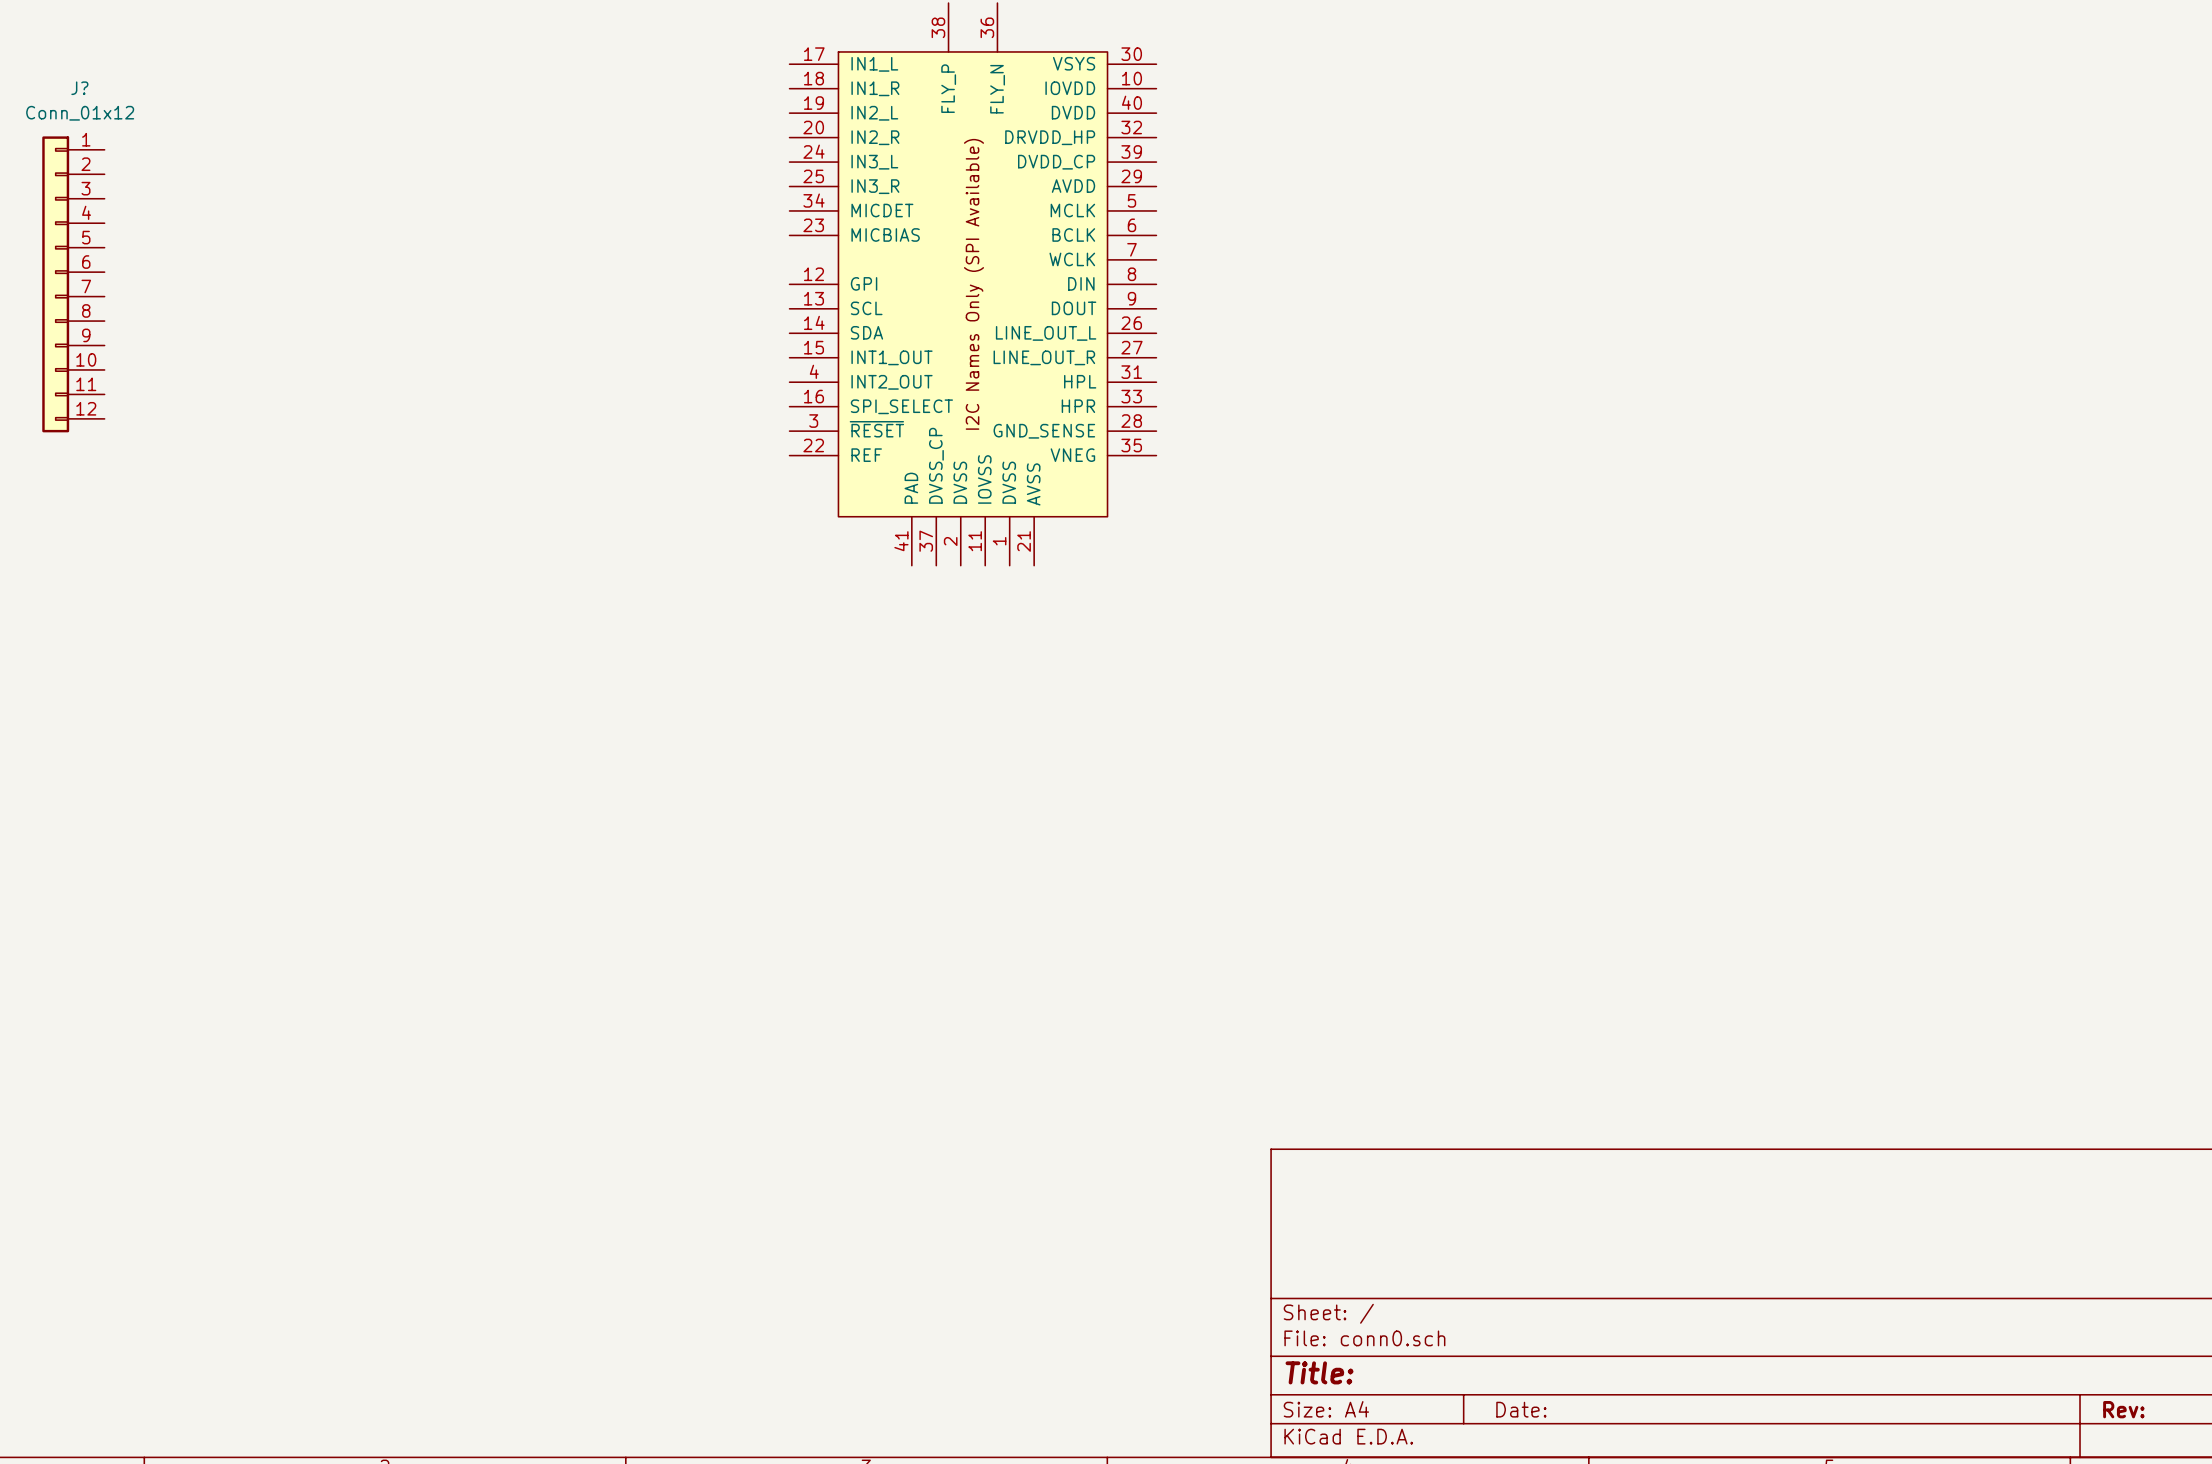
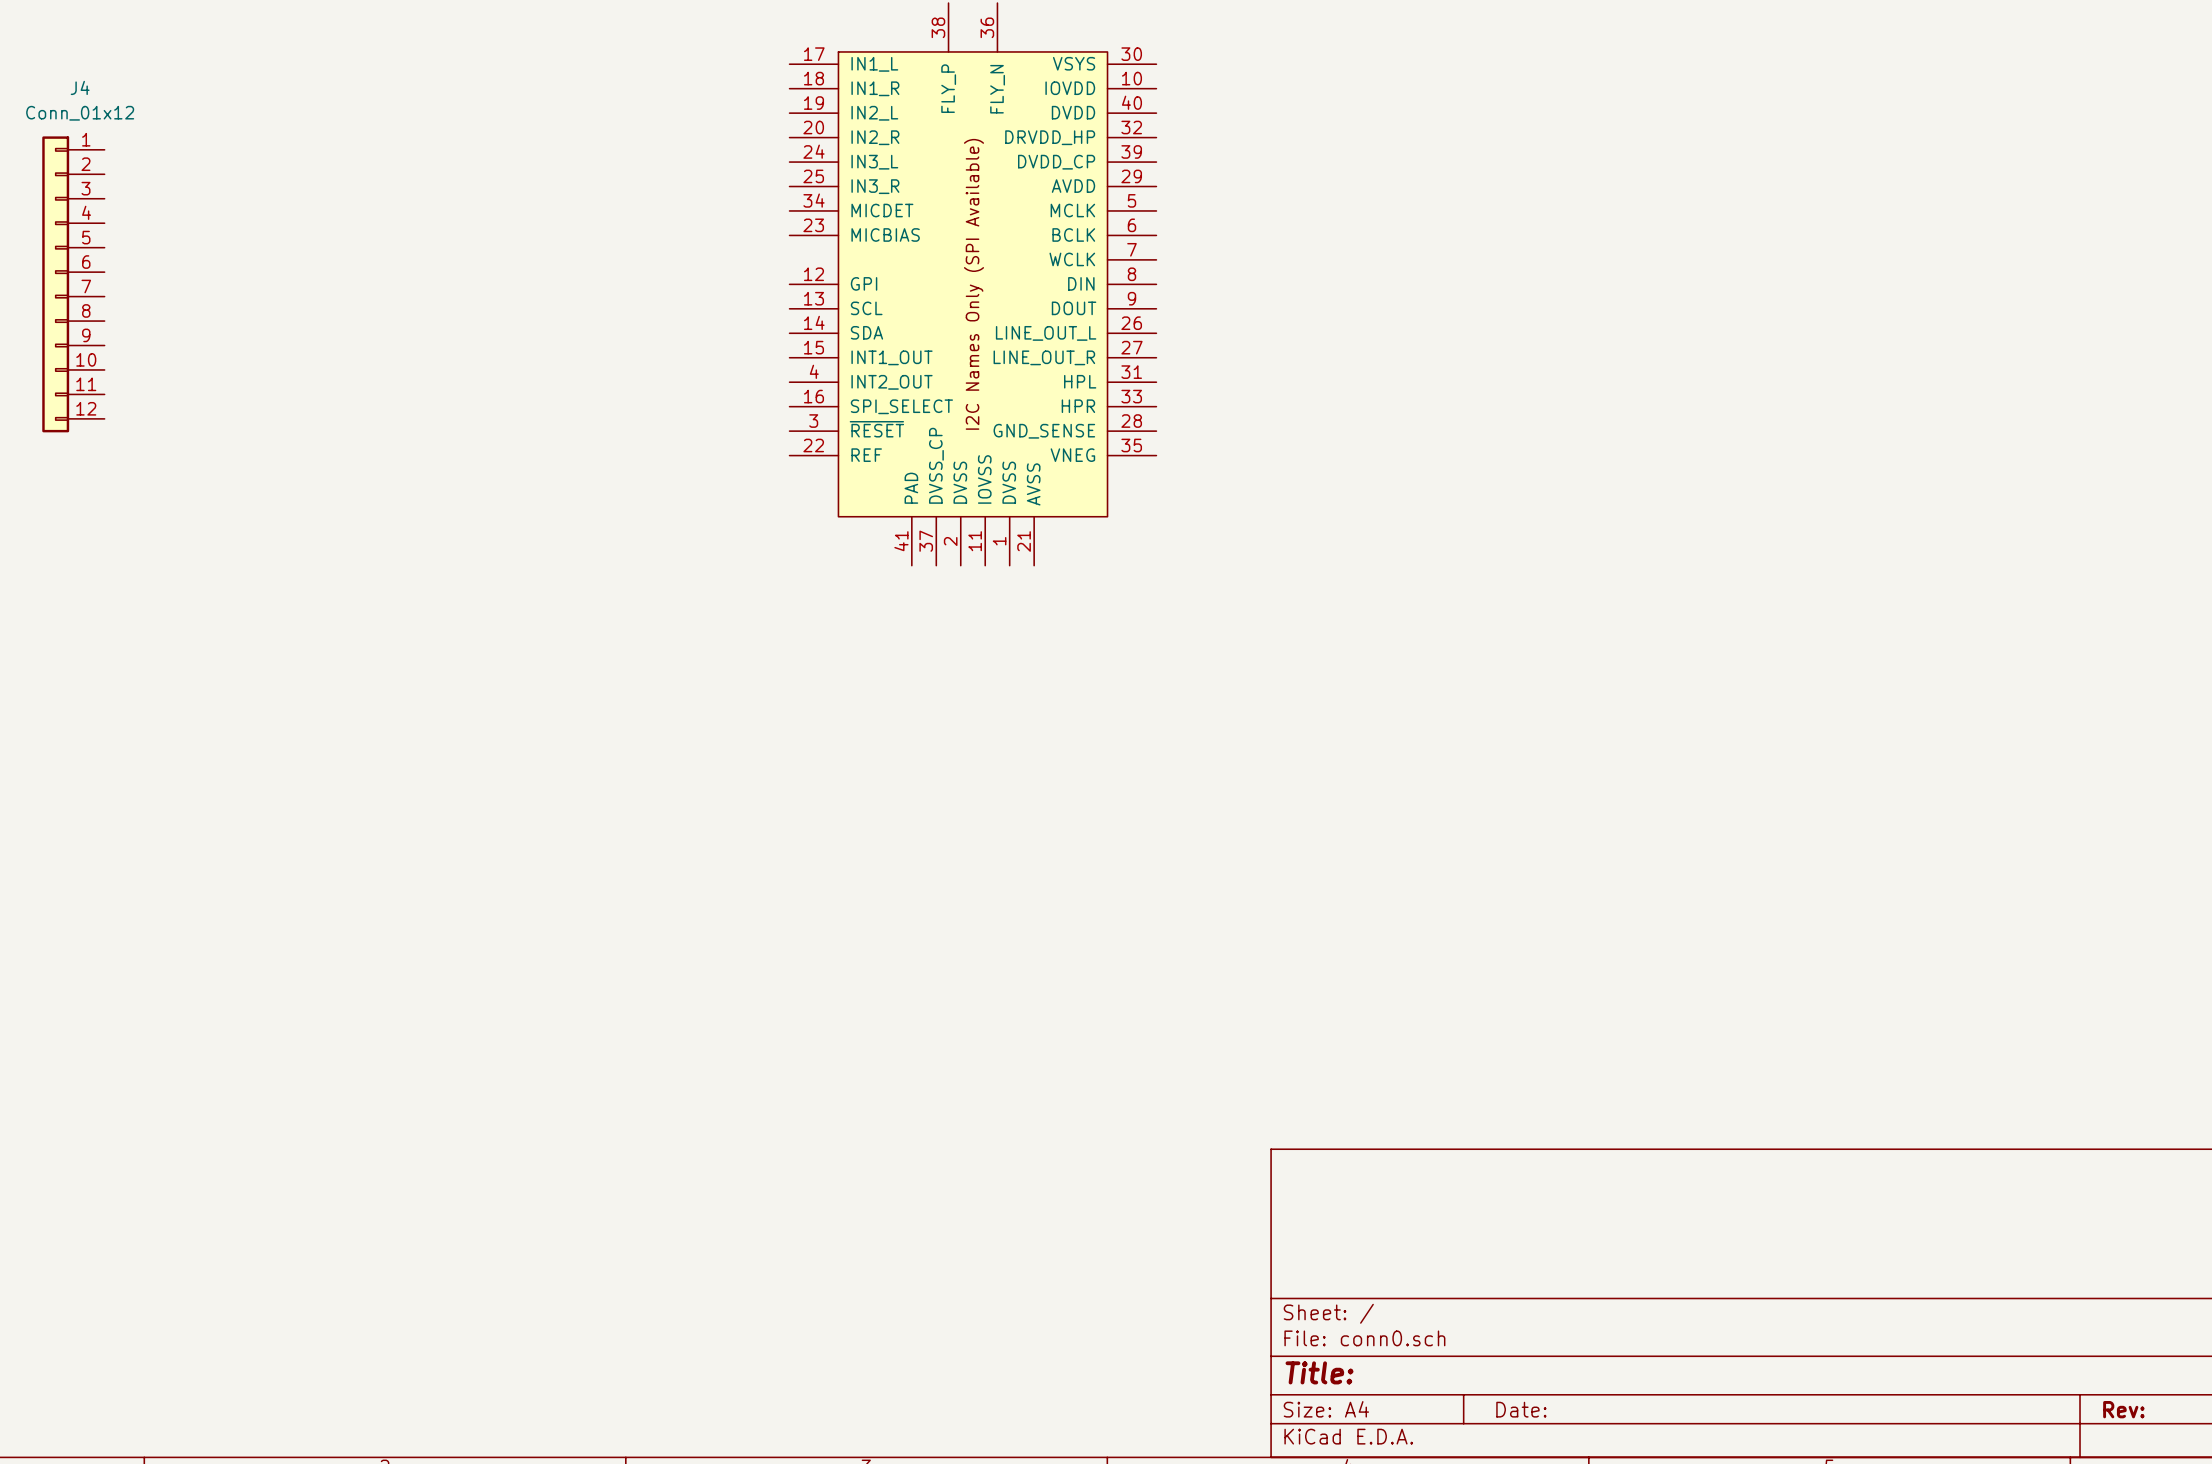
J? name: J? (79, 88) -> J4 (80, 87)

